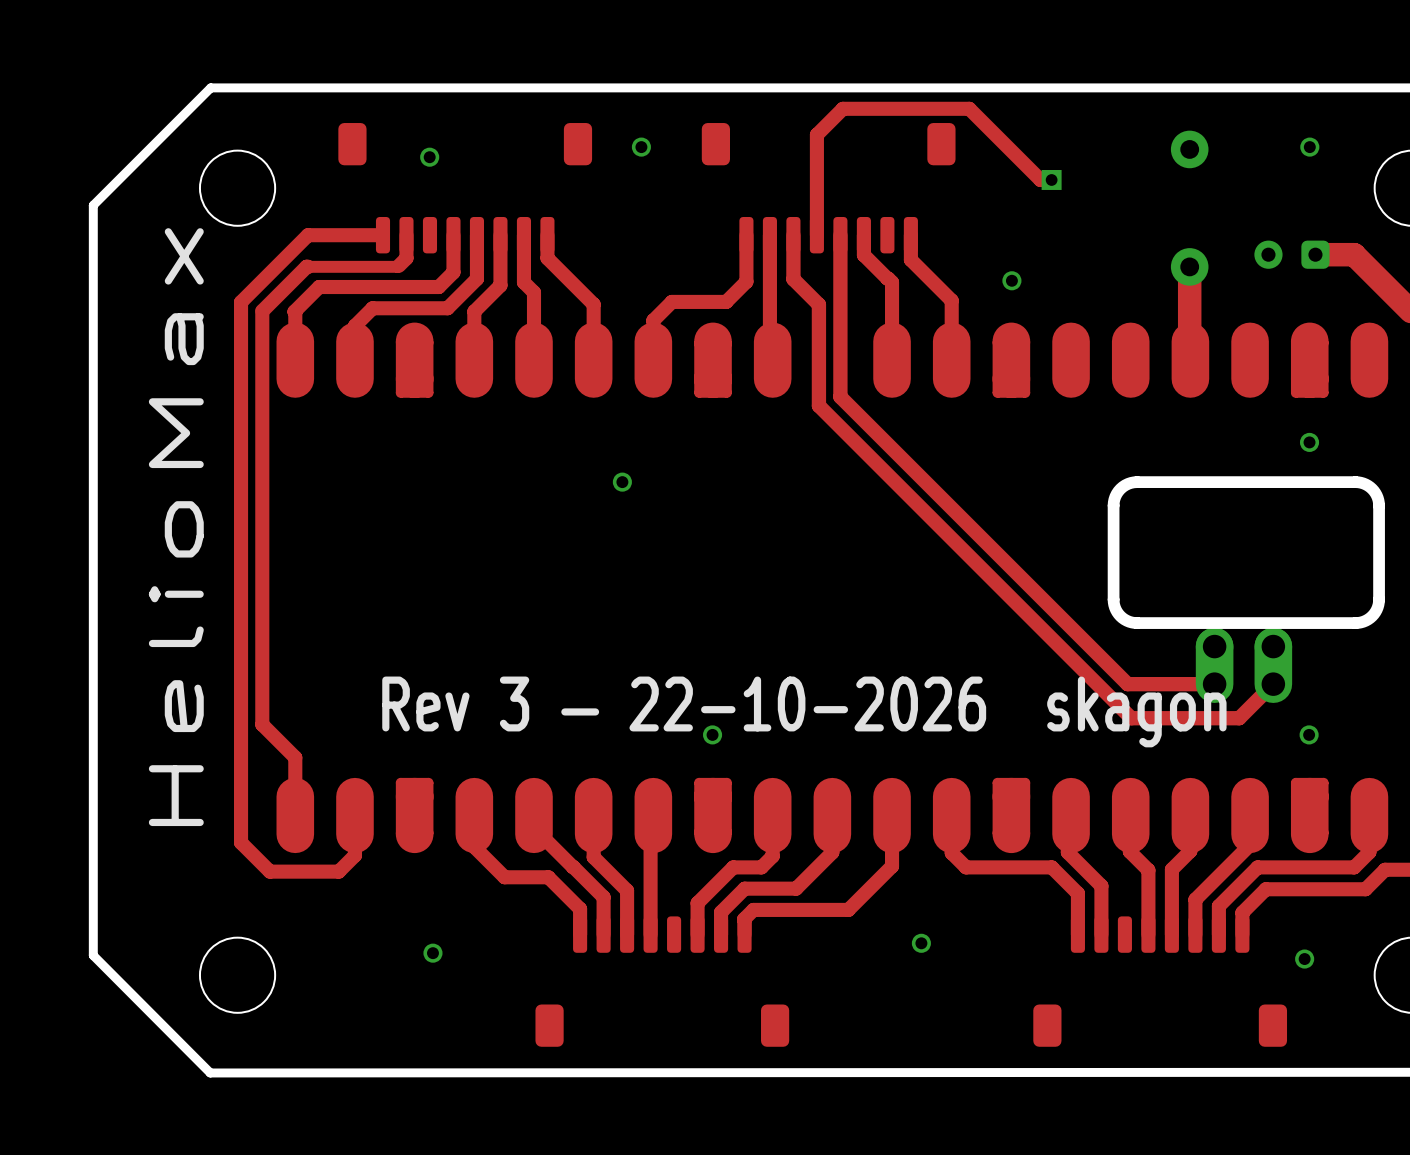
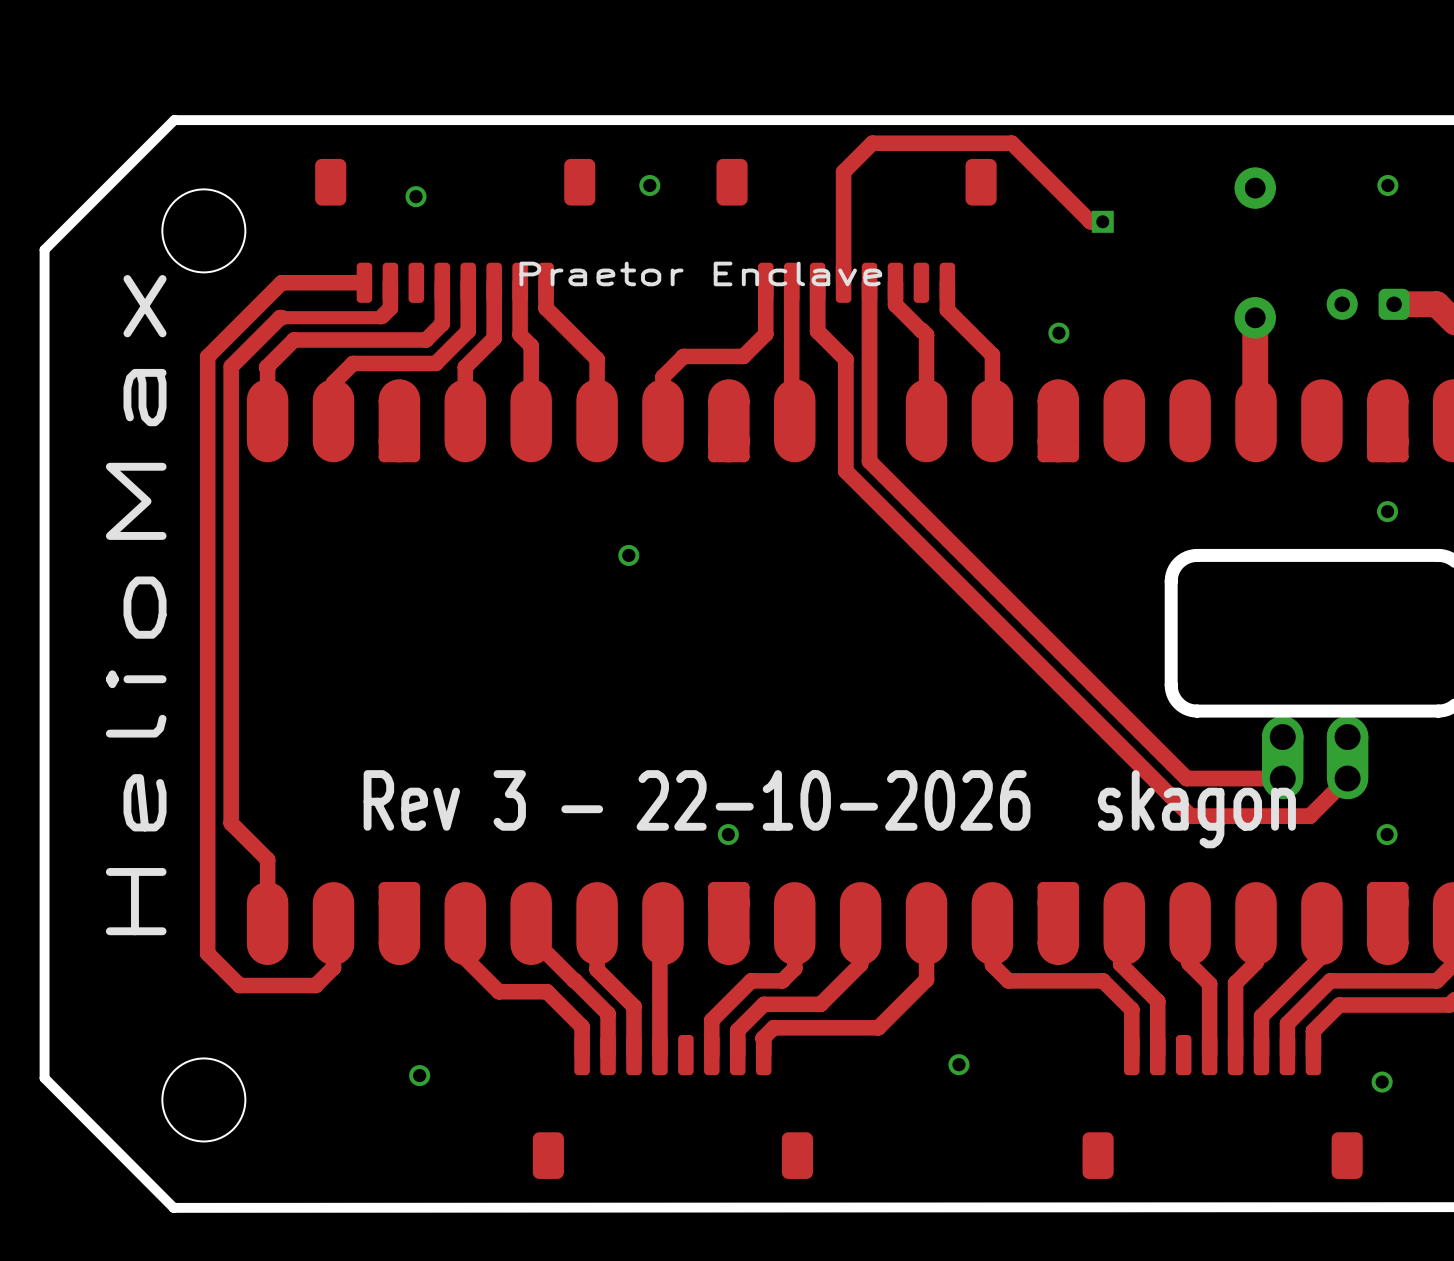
text: none -> Praetor Enclave (700, 273)

